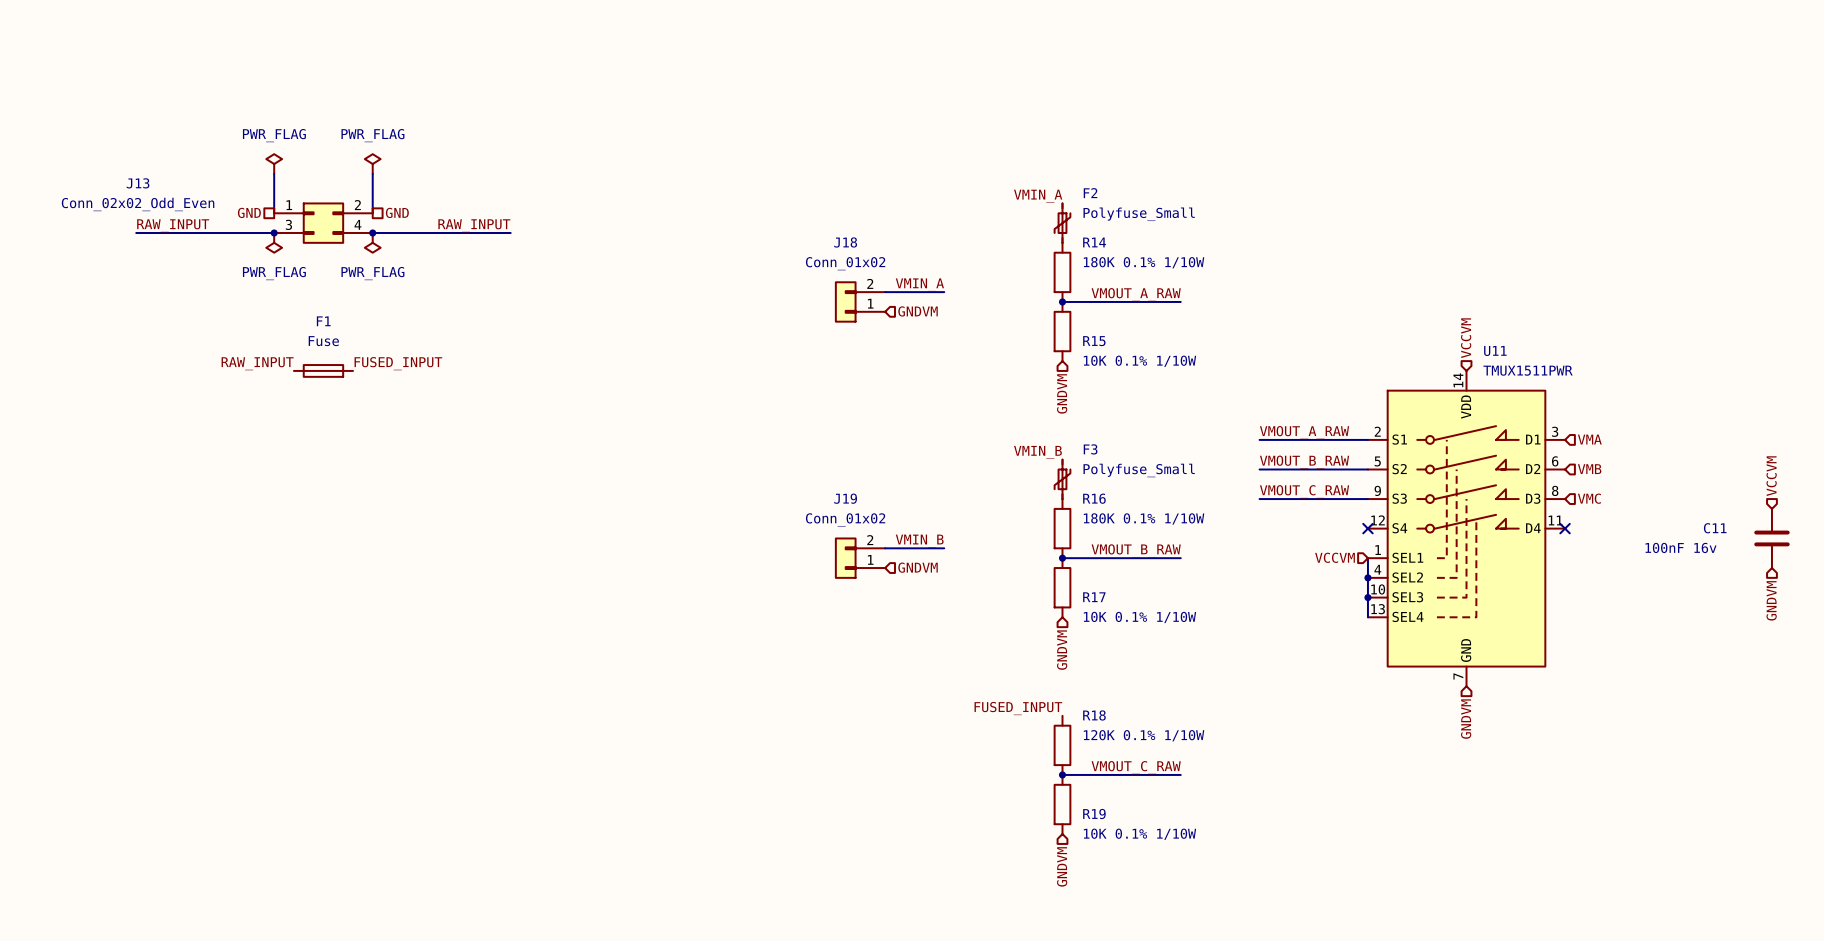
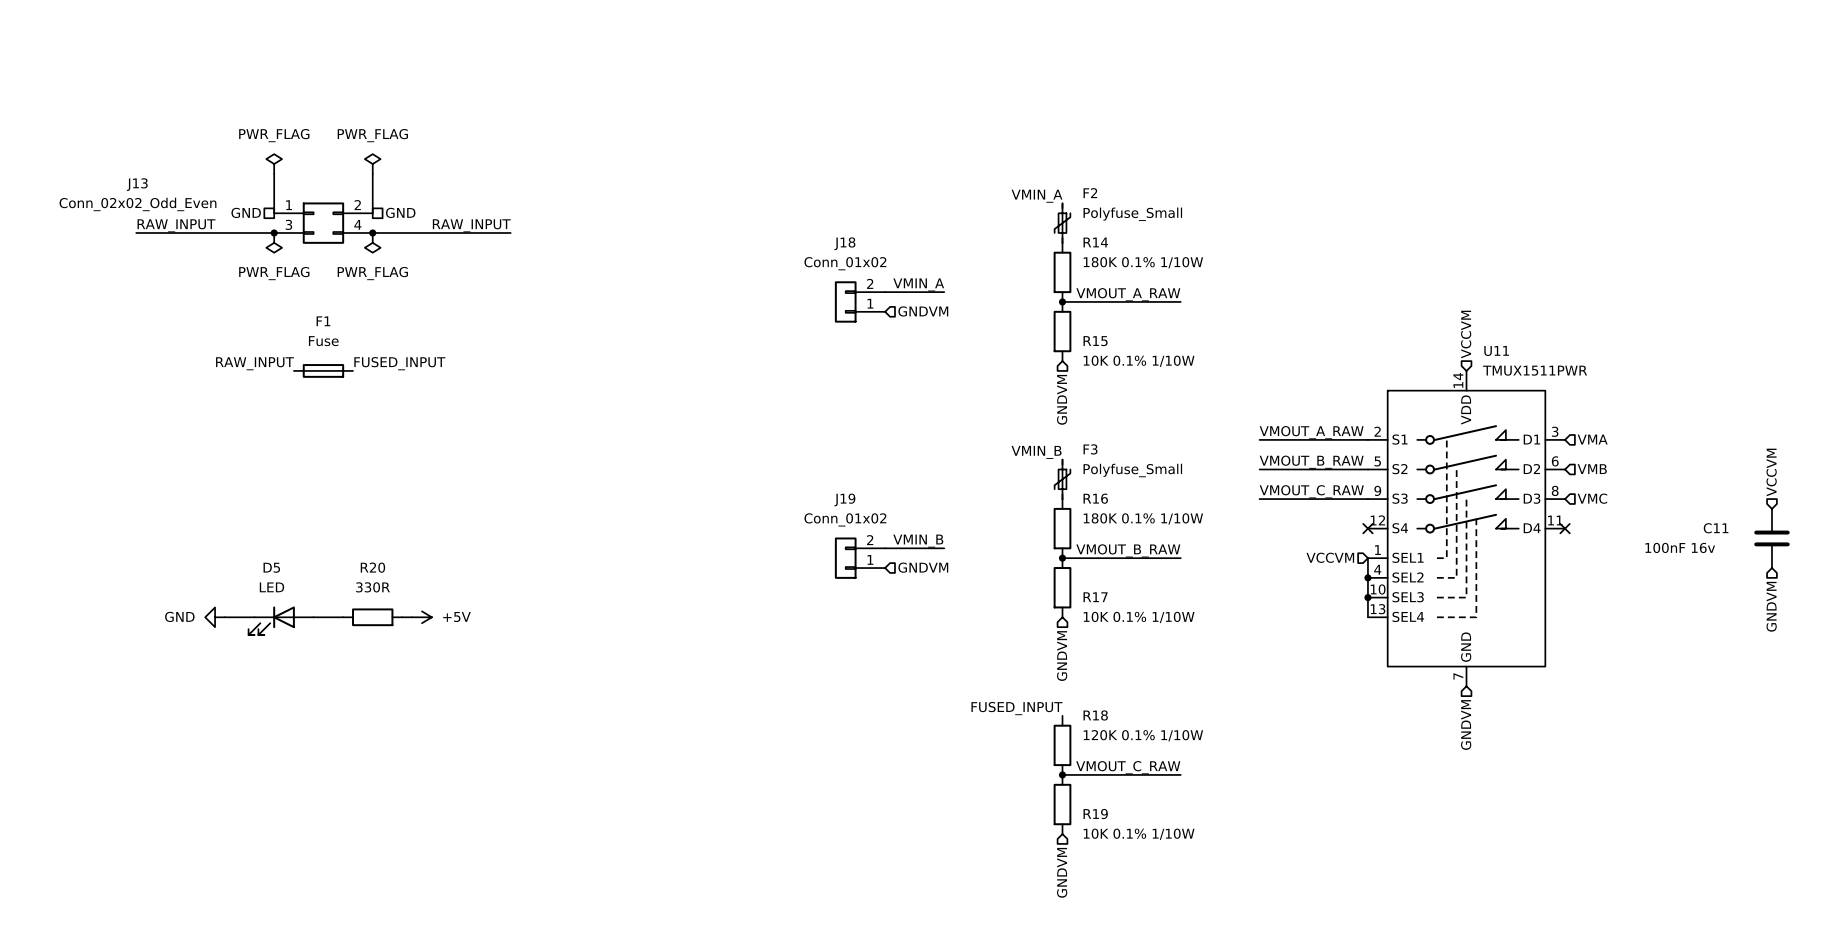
power symbol: none -> GND (215, 617)
wire: none -> (224, 617) (254, 617)
wire: none -> (313, 617) (343, 617)
R20: none -> 330R (372, 617)
wire: none -> (402, 617) (412, 617)
power symbol: none -> +5V (421, 617)
D5: none -> LED (281, 620)

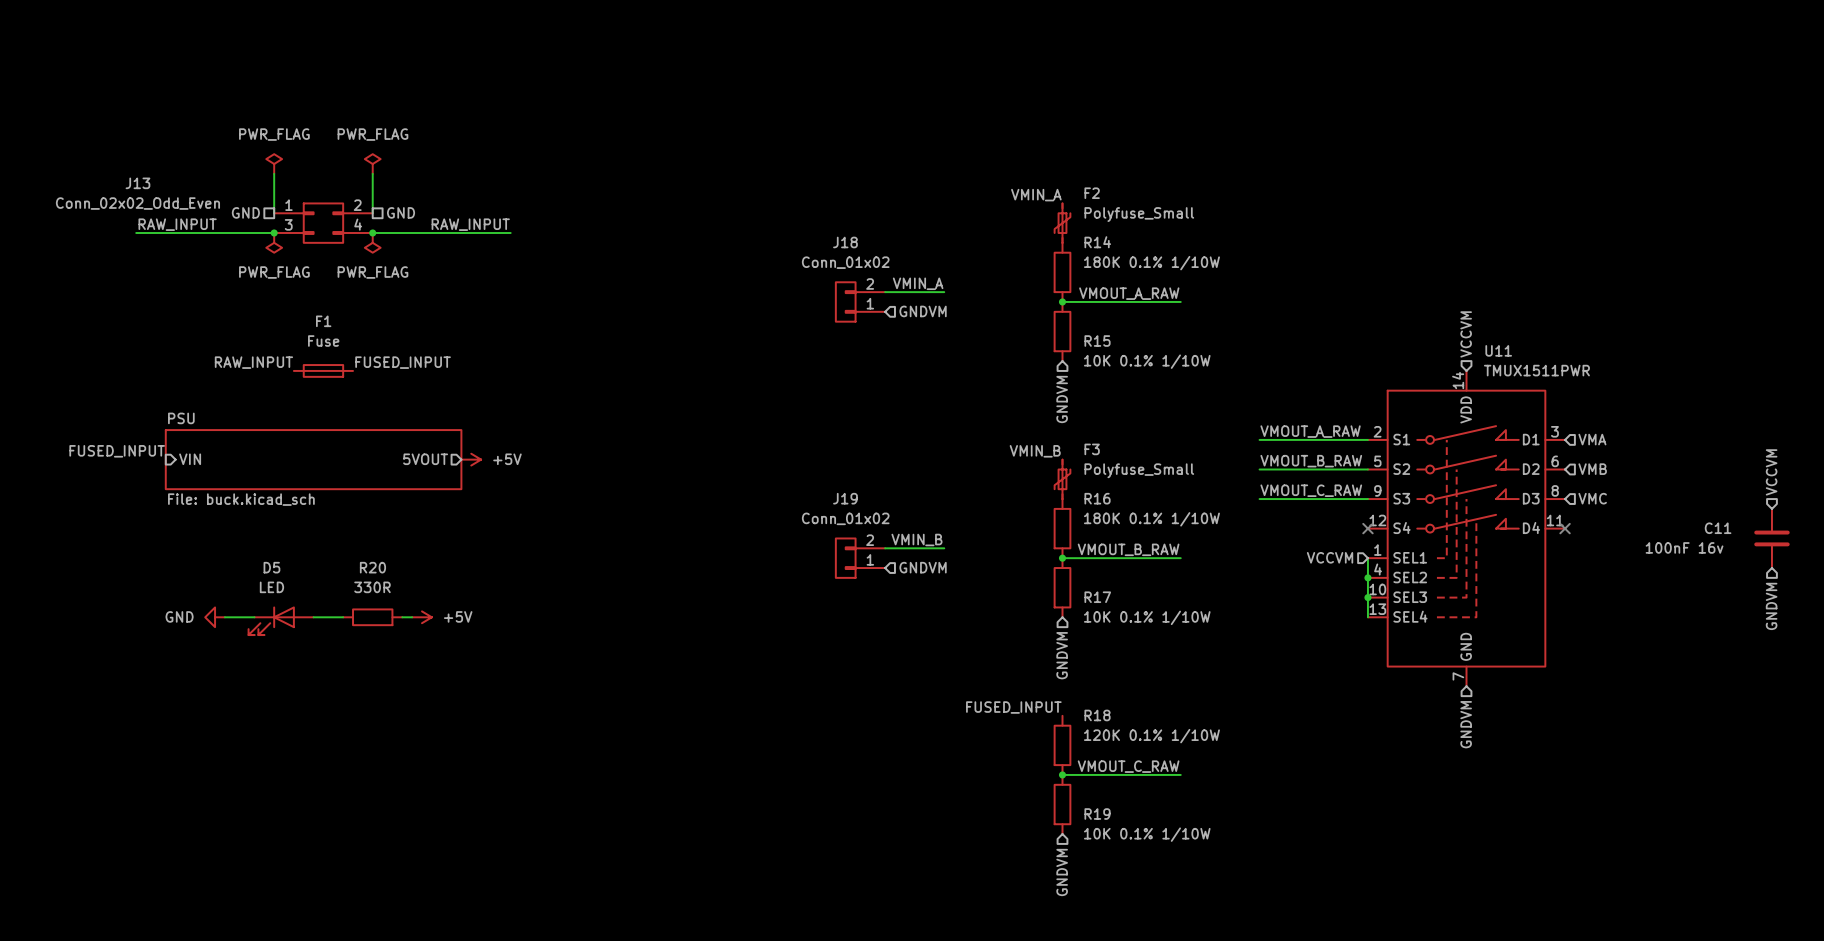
label: none -> FUSED_INPUT (117, 451)
sheet pin: none -> VIN (190, 459)
sheet PSU: none -> File: buck.kicad_sch (313, 459)
sheet pin: none -> 5VOUT (425, 459)
power symbol: none -> +5V (471, 459)

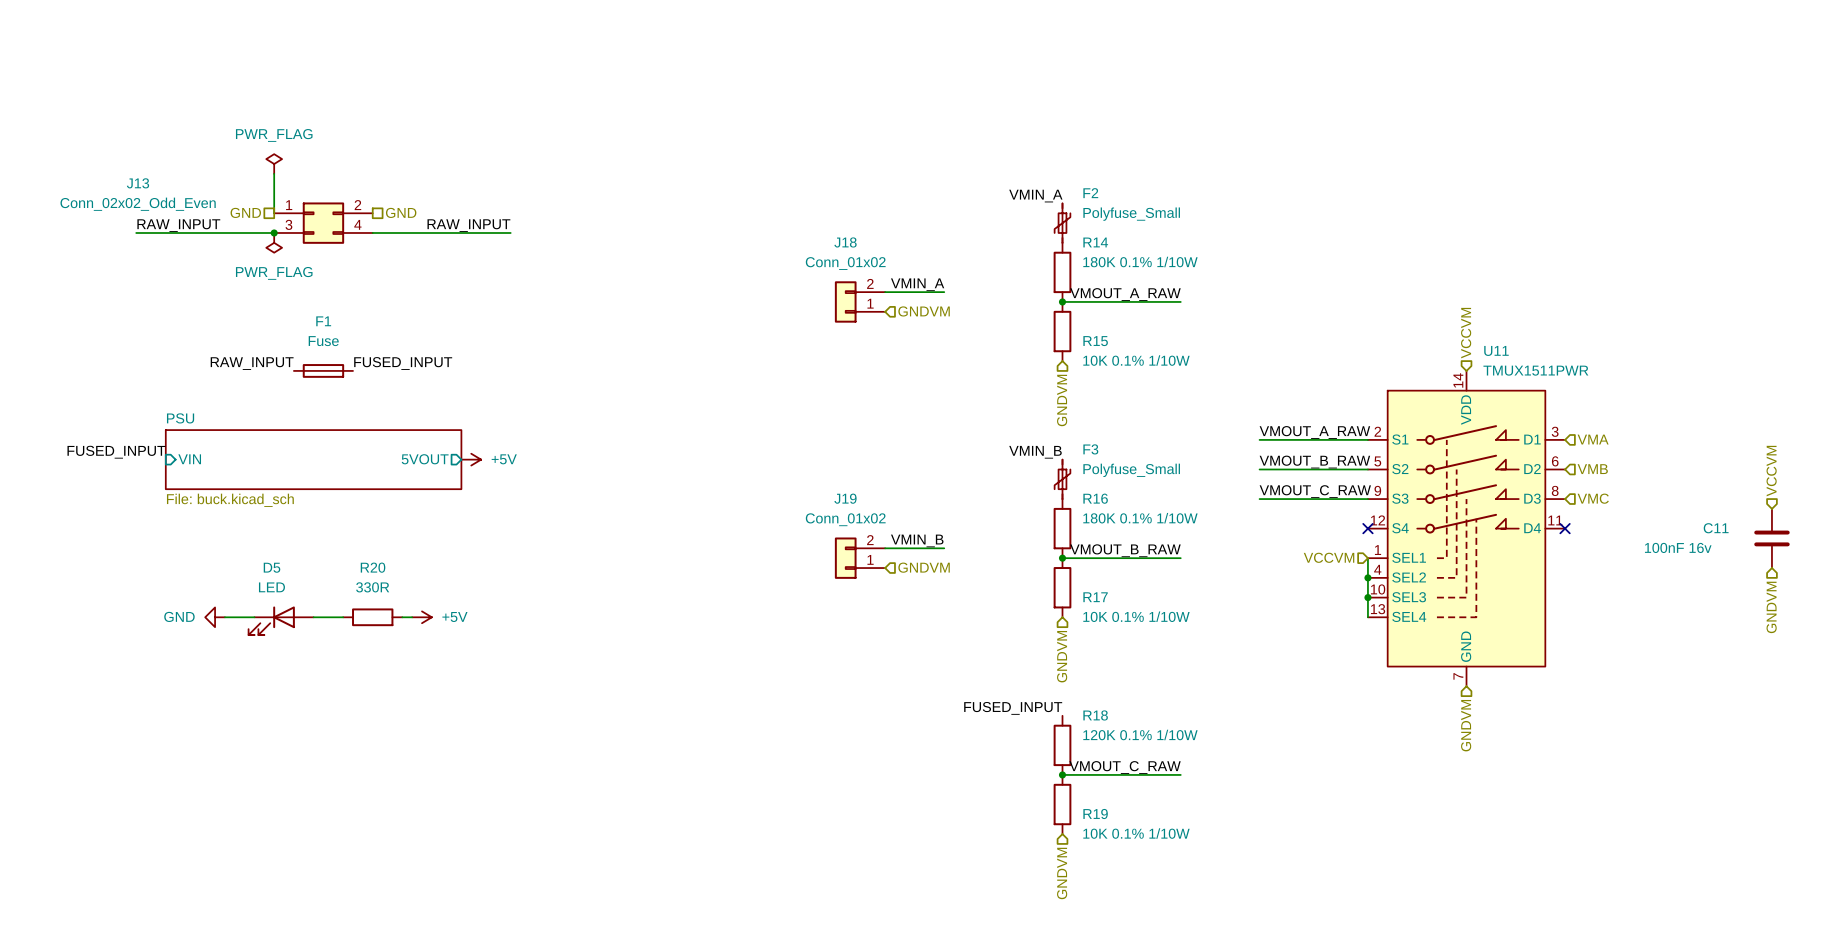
power symbol: PWR_FLAG (372, 164) -> none
wire: (372, 173) (372, 213) -> none
junction: (372, 232) -> none
power symbol: PWR_FLAG (372, 242) -> none

